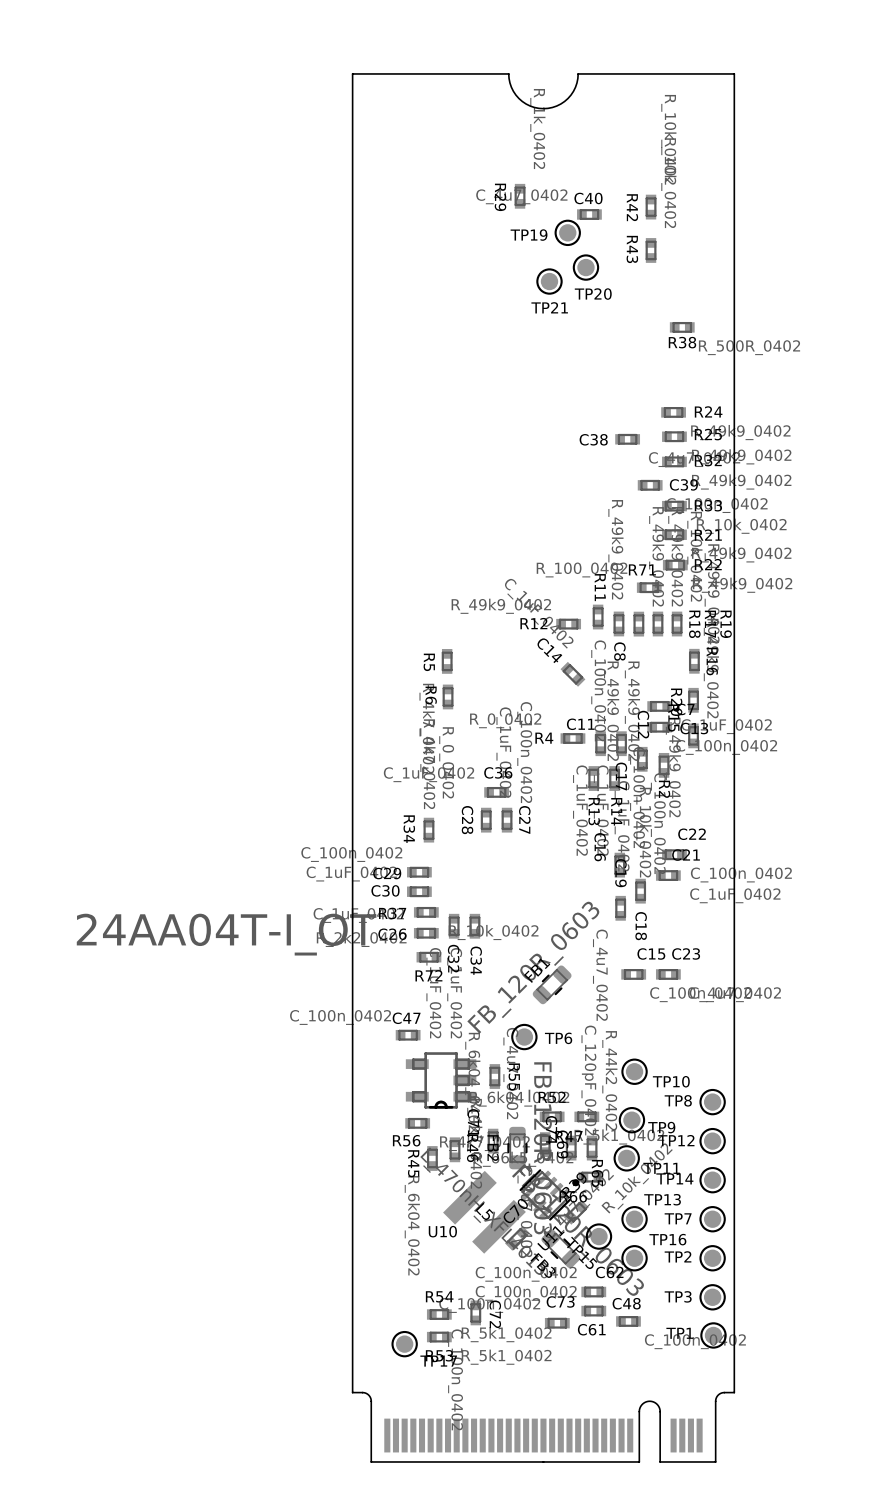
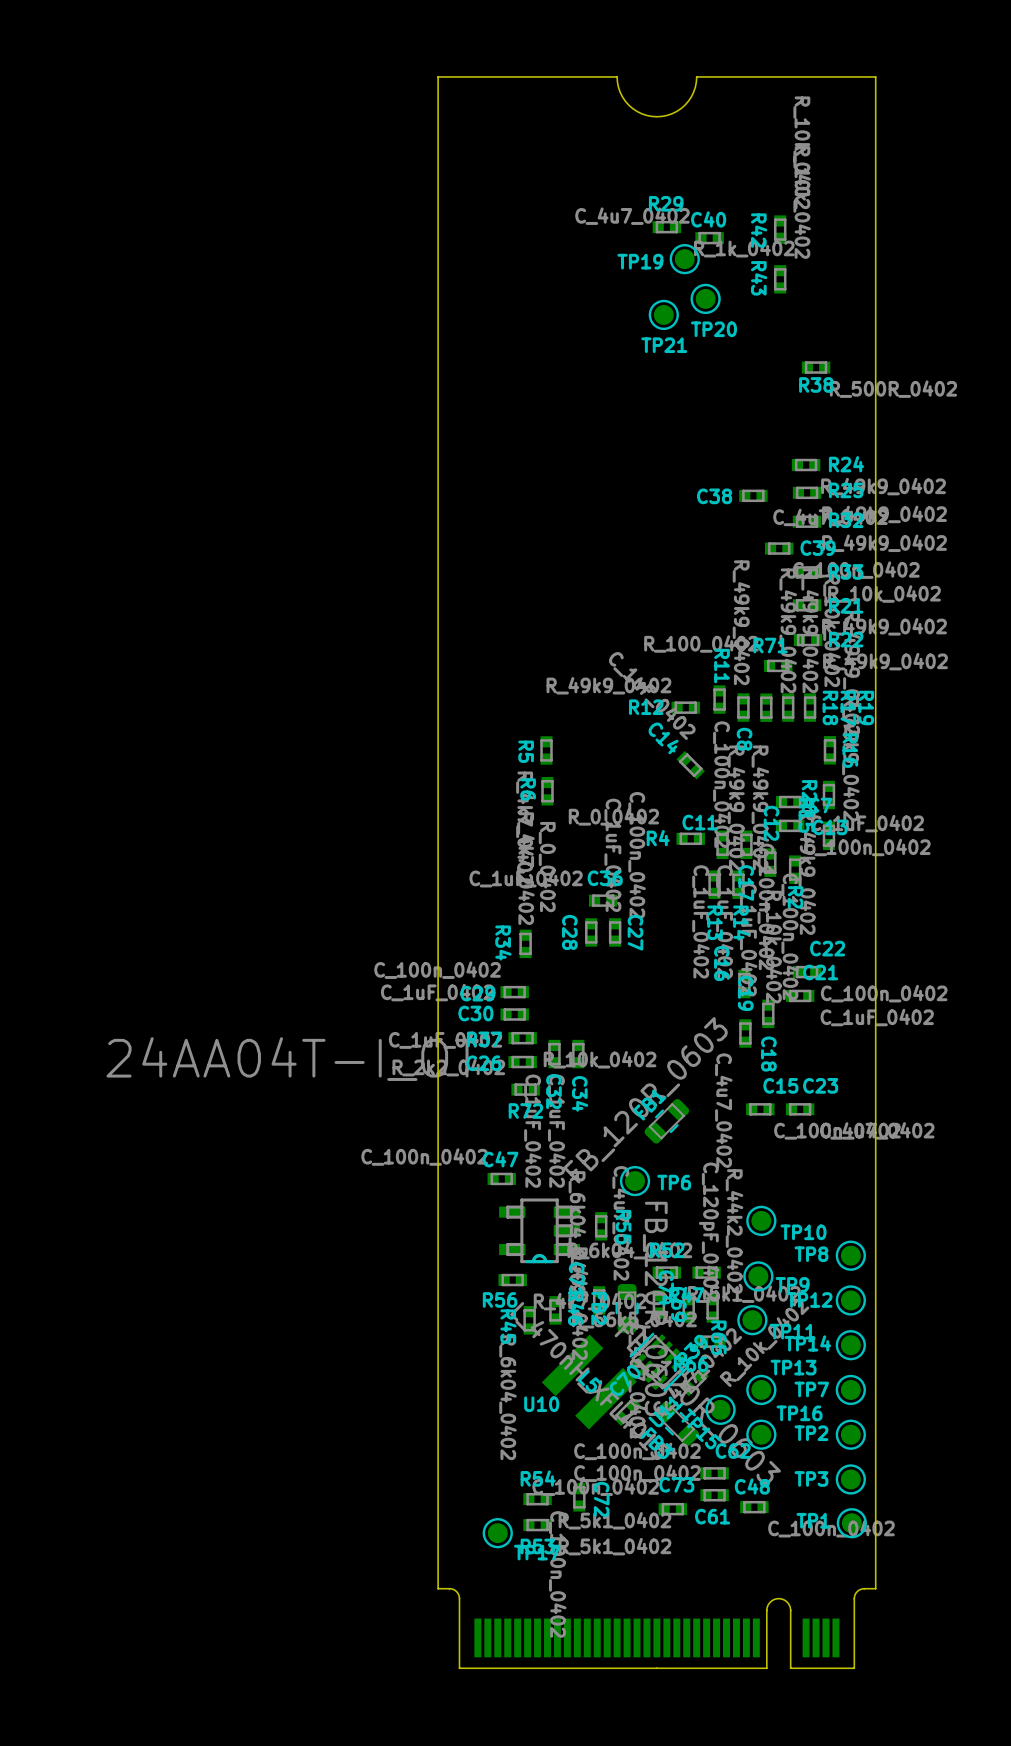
R29 rotation: 0° (520, 196) -> 90° clockwise (666, 227)
R29 position: (520, 196) -> (666, 227)

